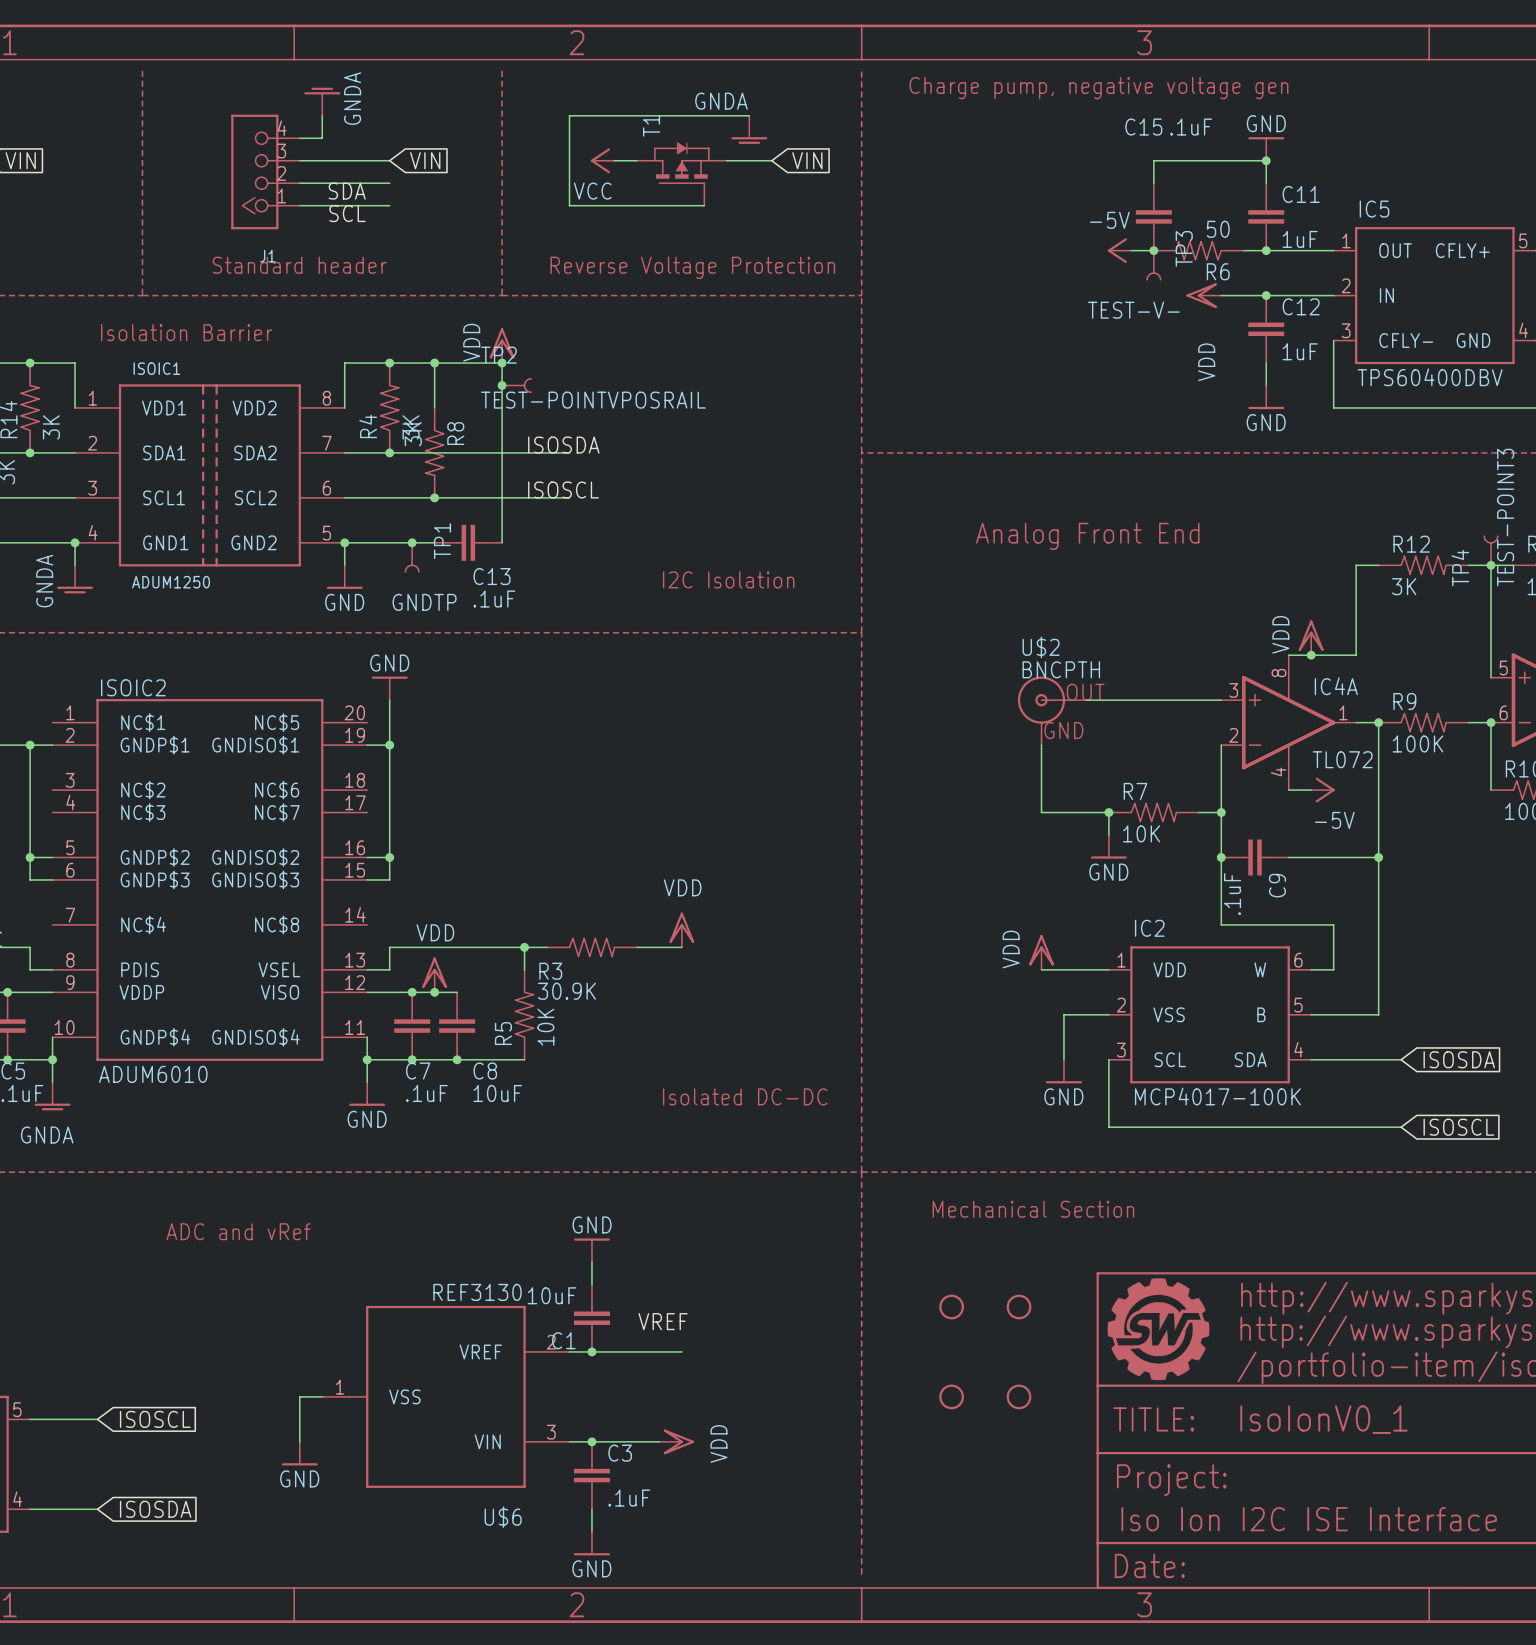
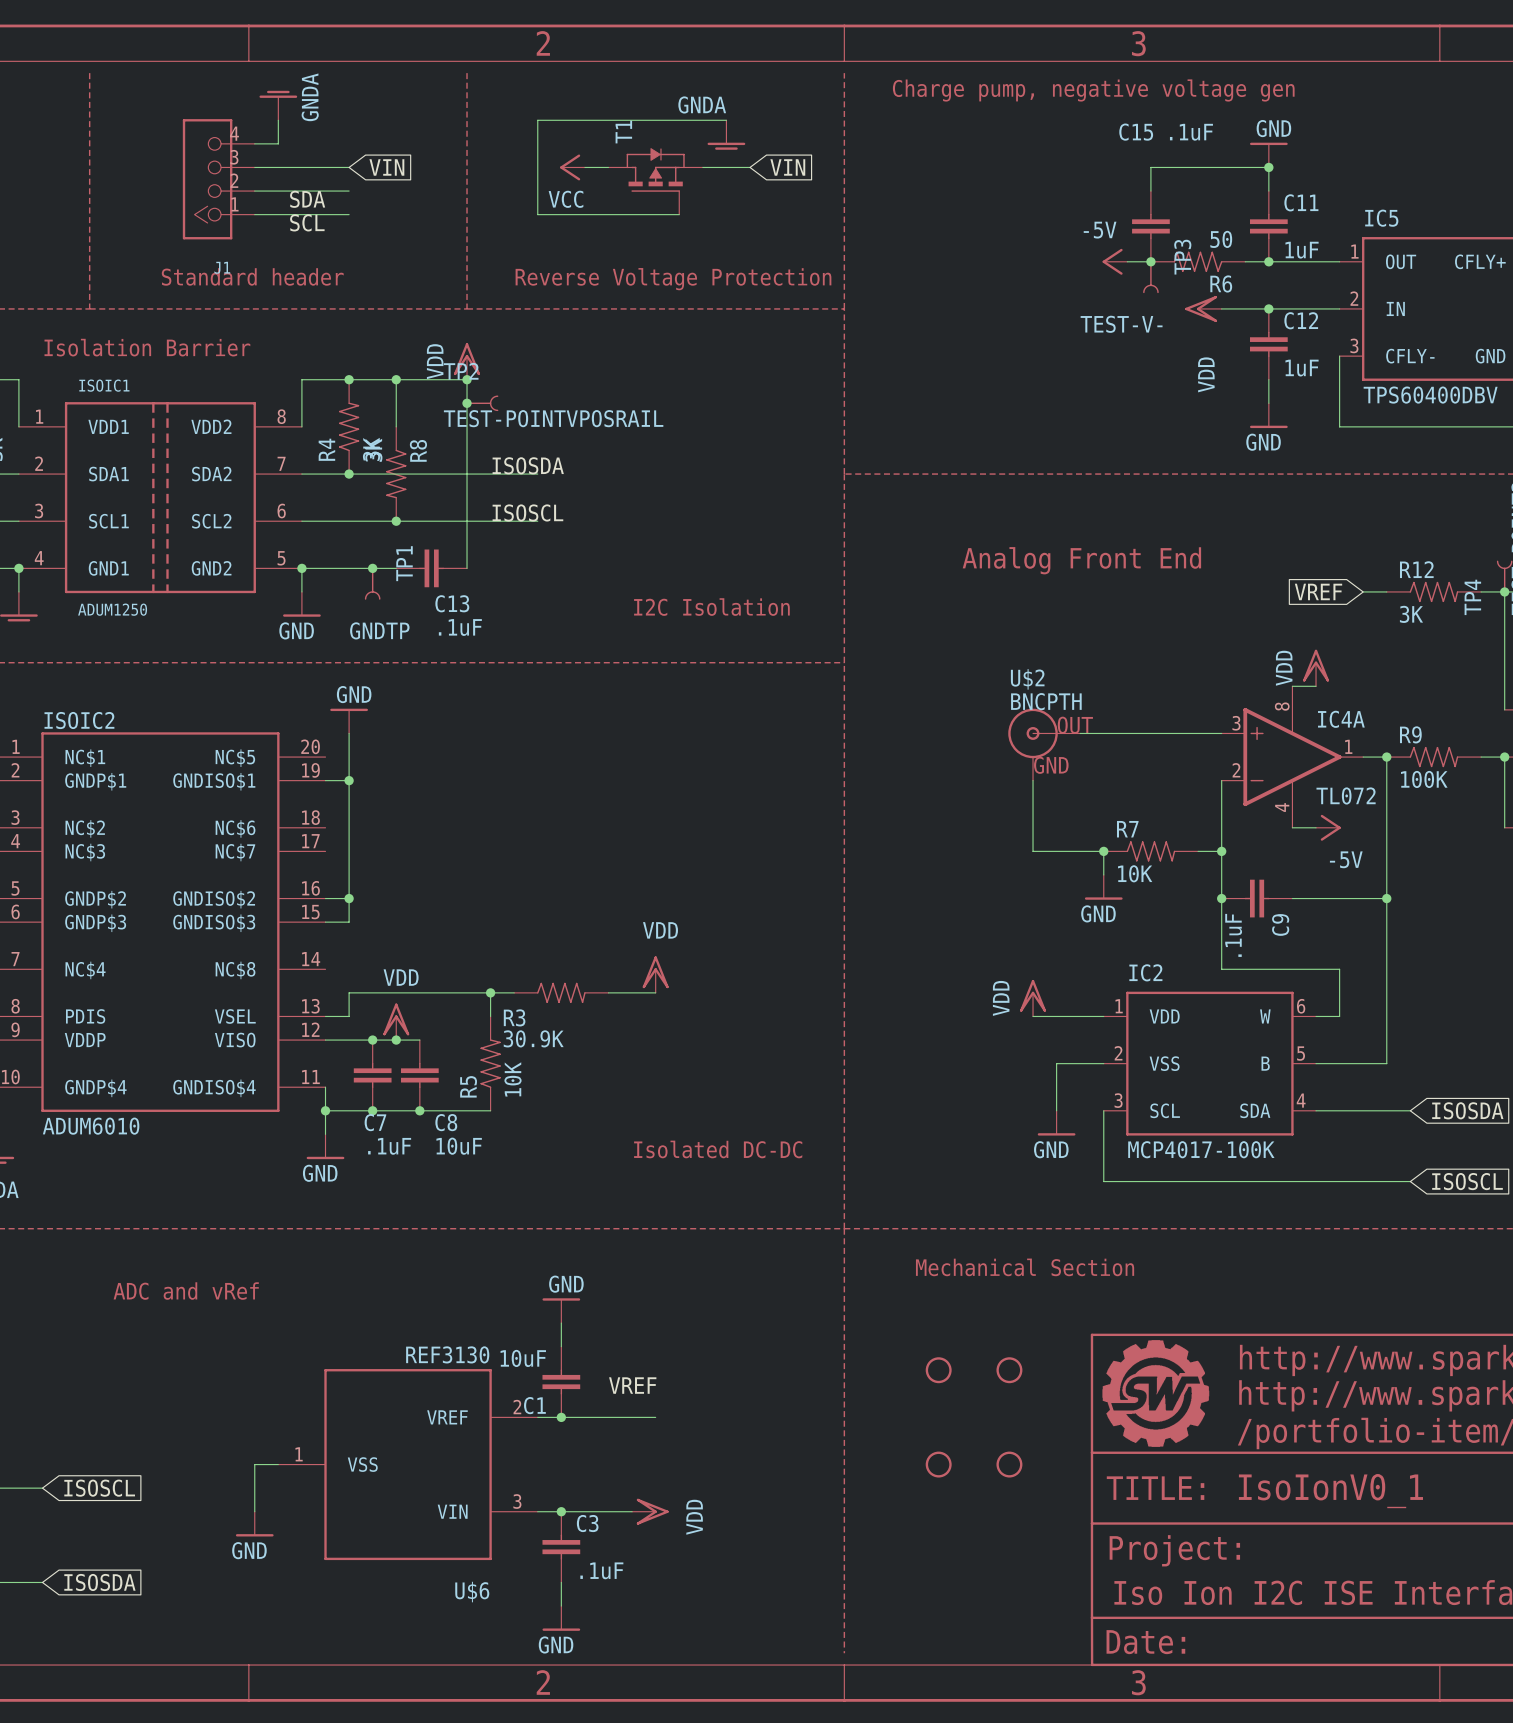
global label: none -> VREF (1318, 591)
wire: (1356, 565) (1356, 655) (1311, 655) -> none
junction: (1311, 655) -> none

